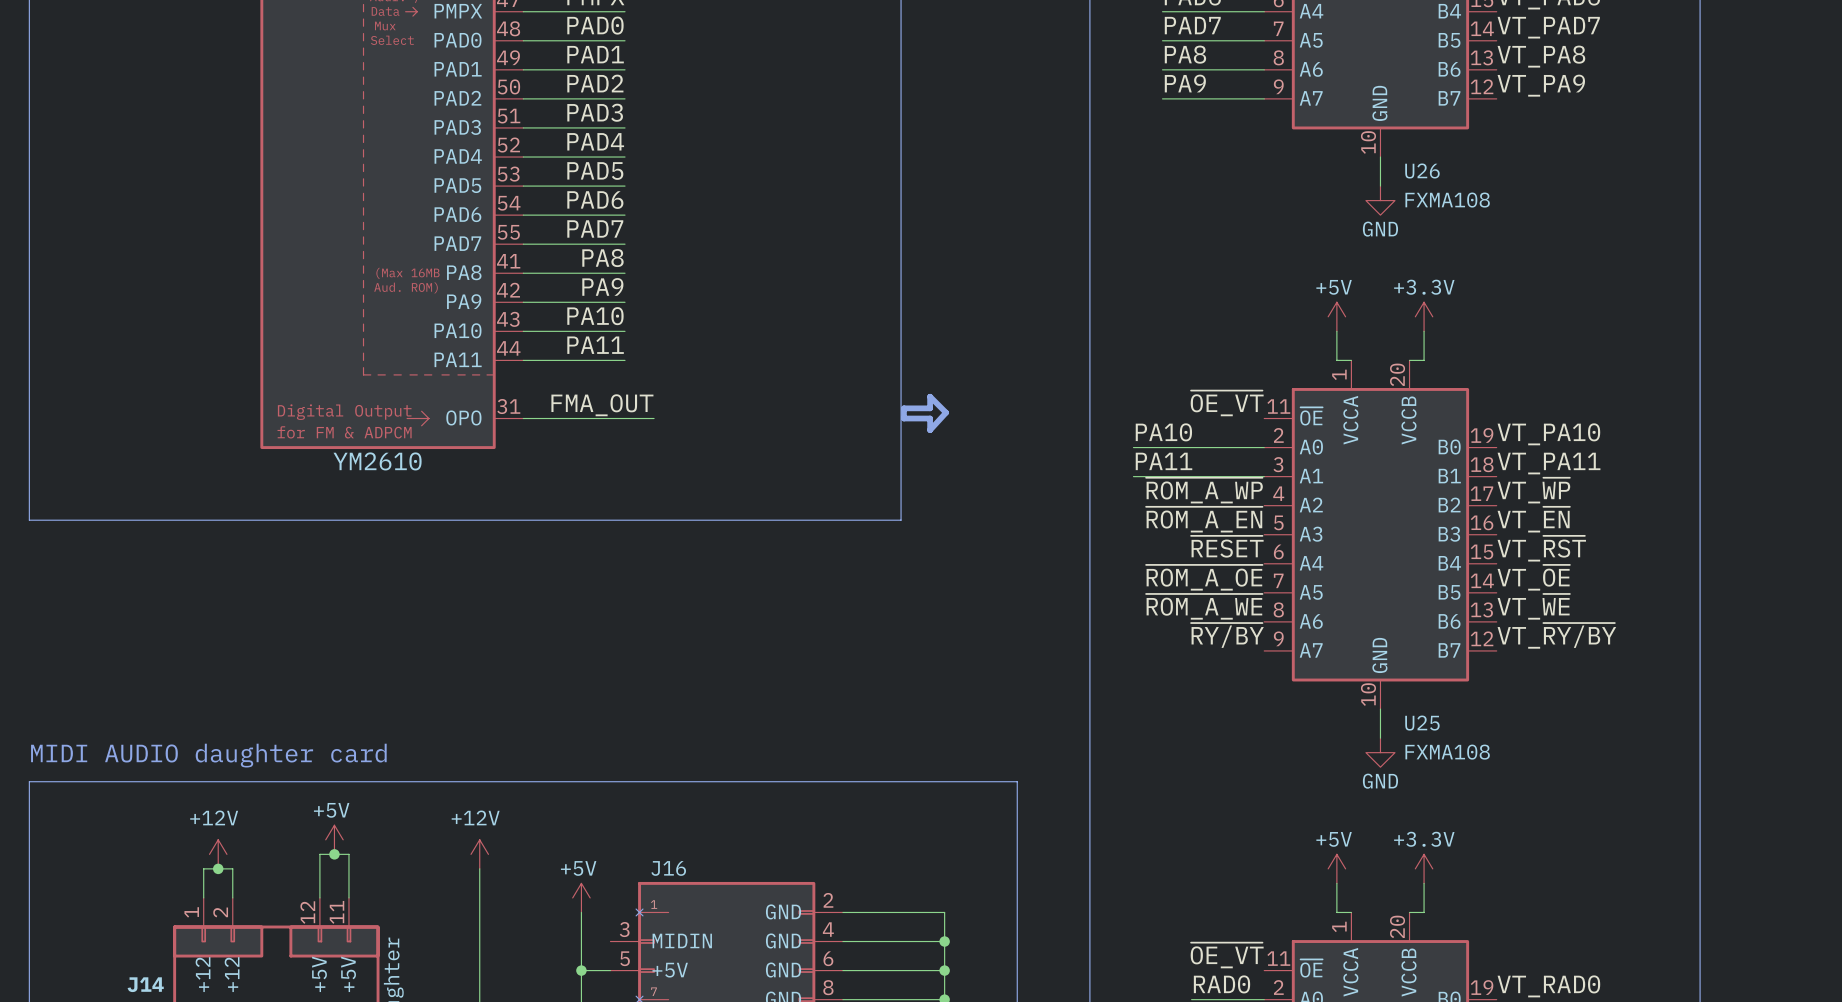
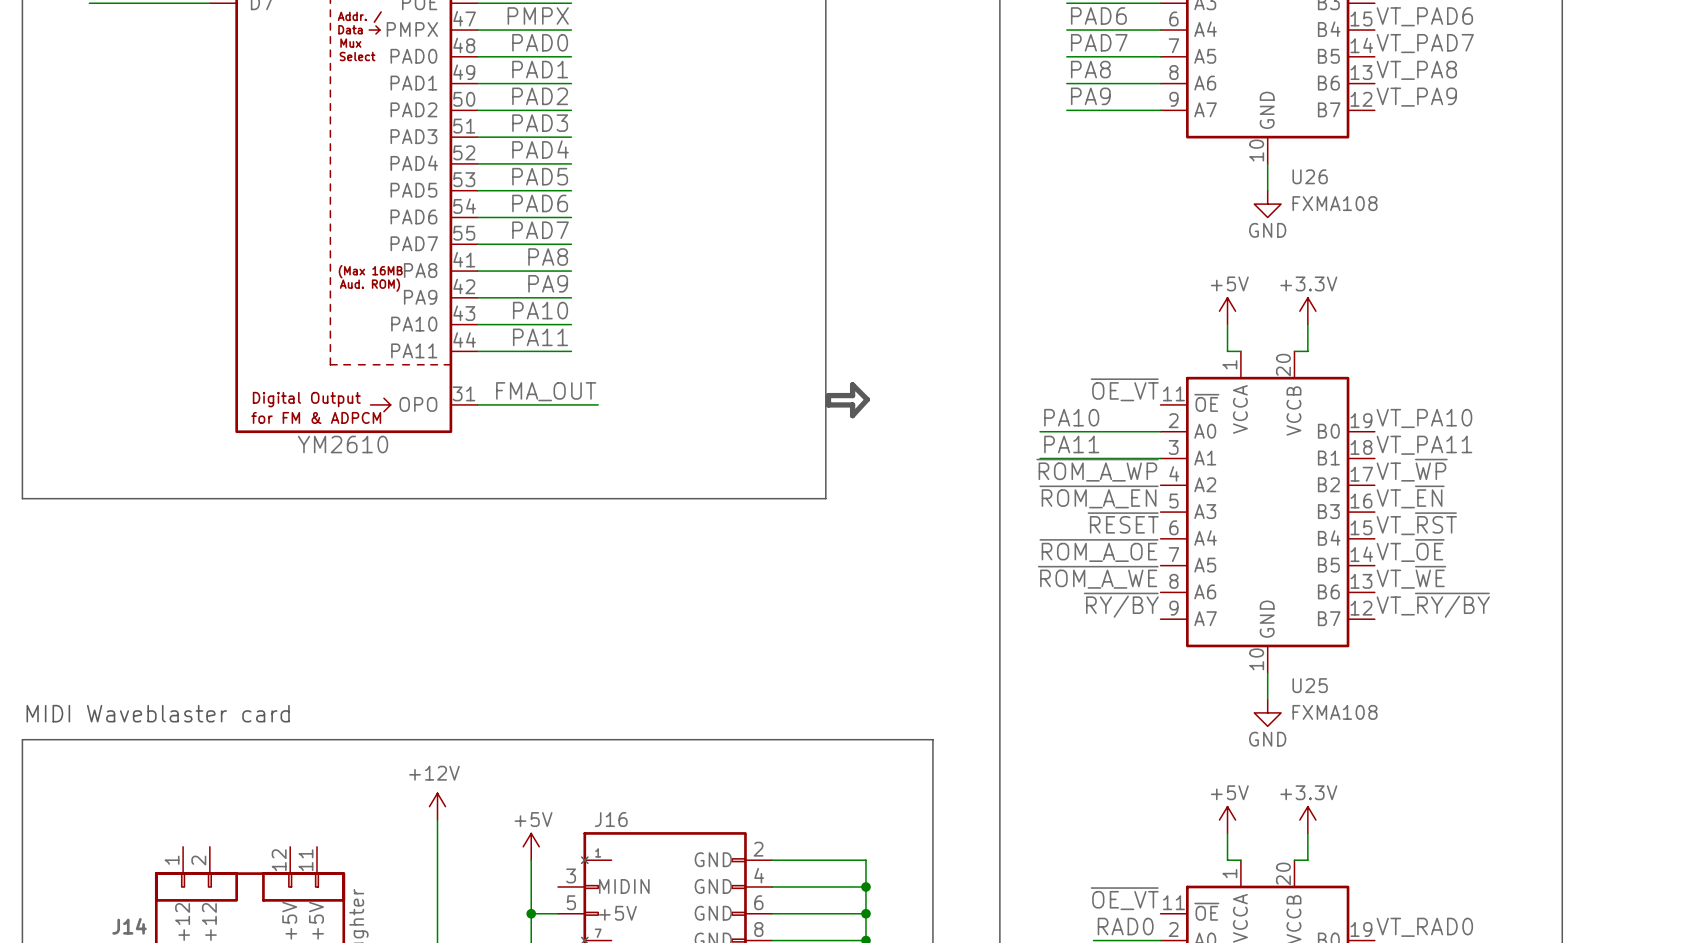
text: MIDI AUDIO daughter card (208, 755) -> MIDI Waveblaster card (158, 713)
power symbol: +5V (334, 839) -> none
power symbol: +12V (218, 854) -> none
junction: (334, 854) -> none
junction: (218, 868) -> none
wire: (203, 897) (203, 868) (232, 868) (232, 897) -> none
wire: (319, 897) (319, 854) (348, 854) (348, 897) -> none

